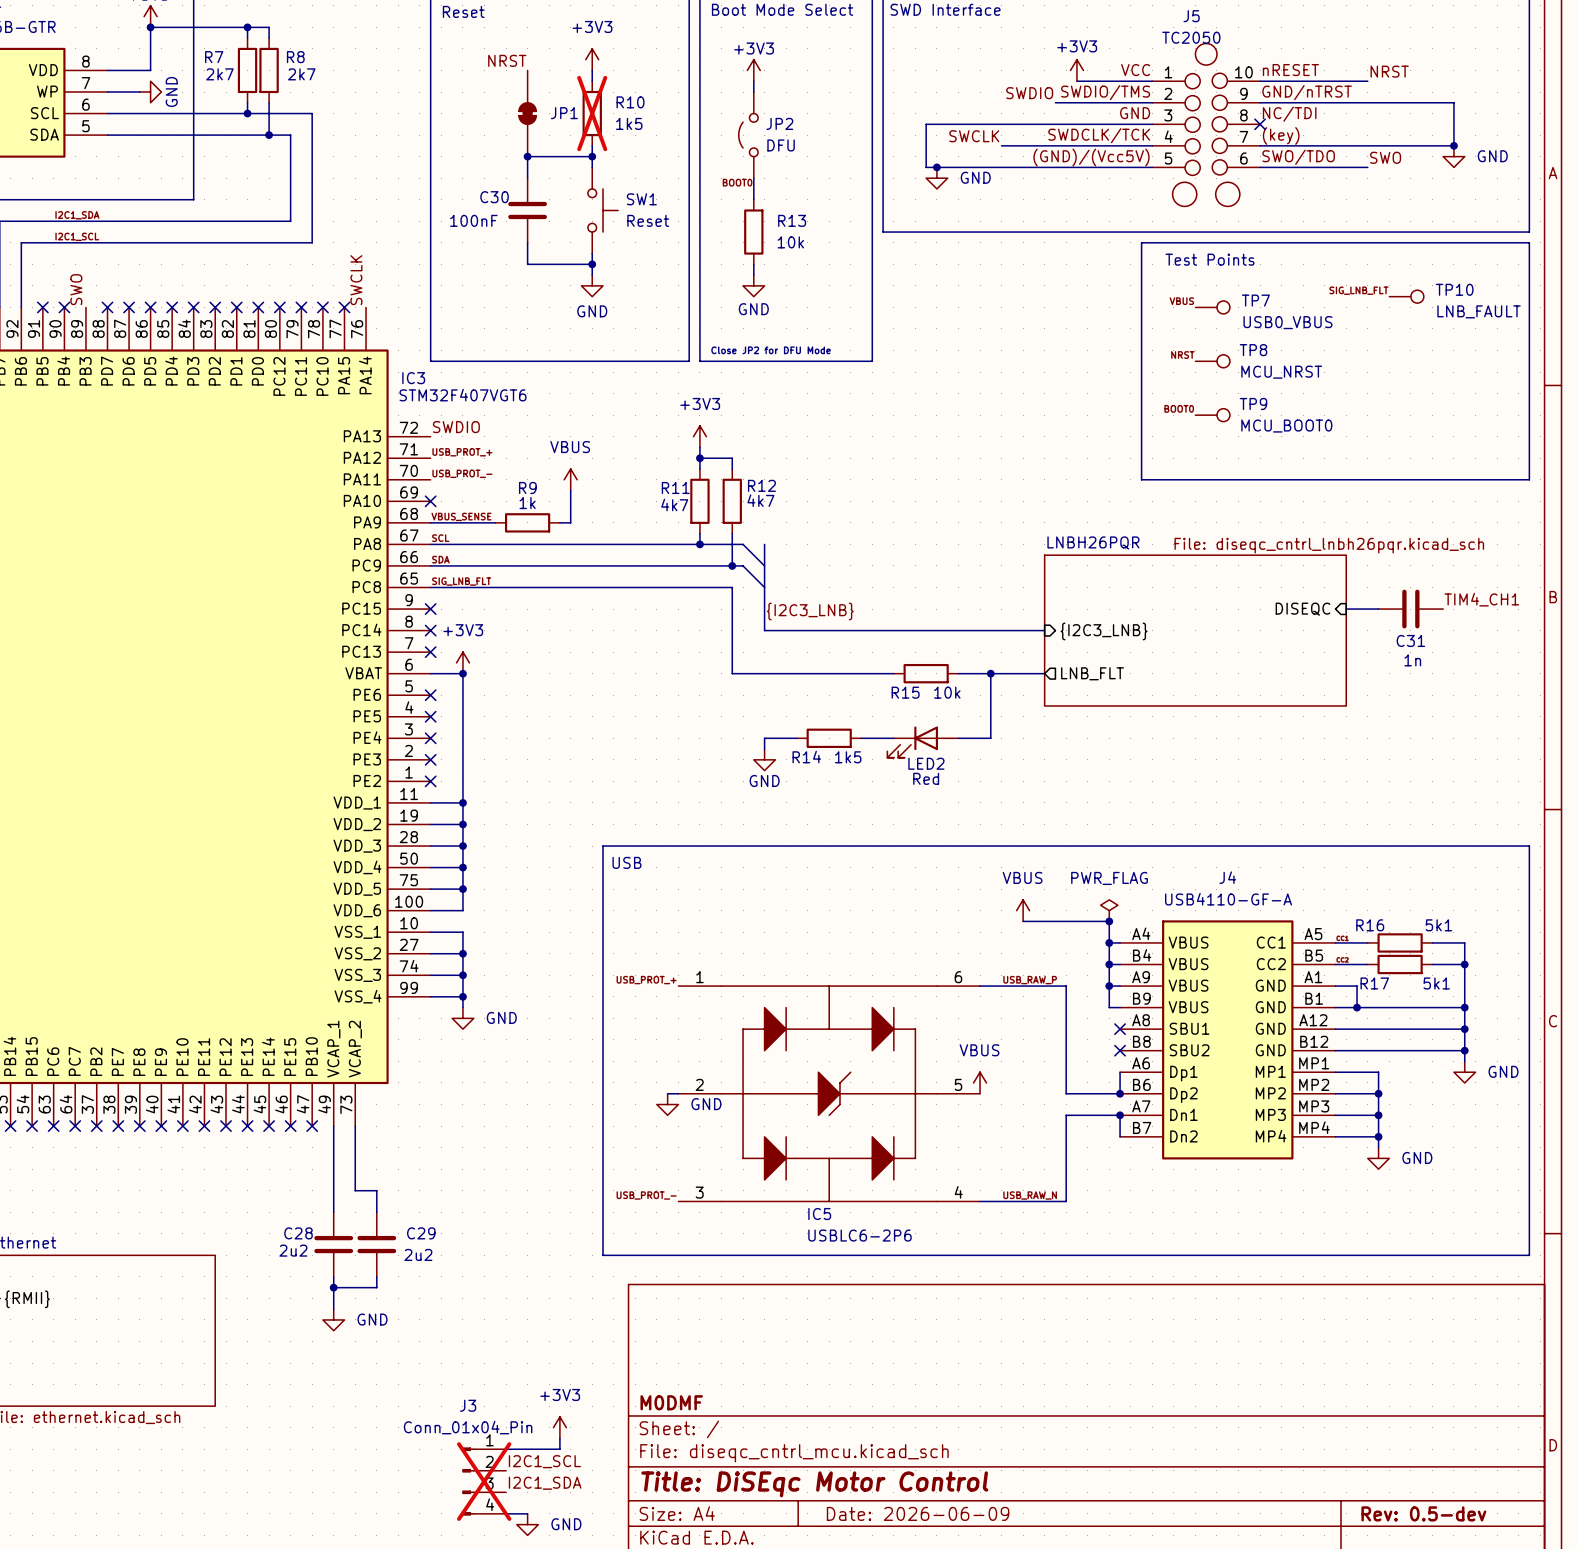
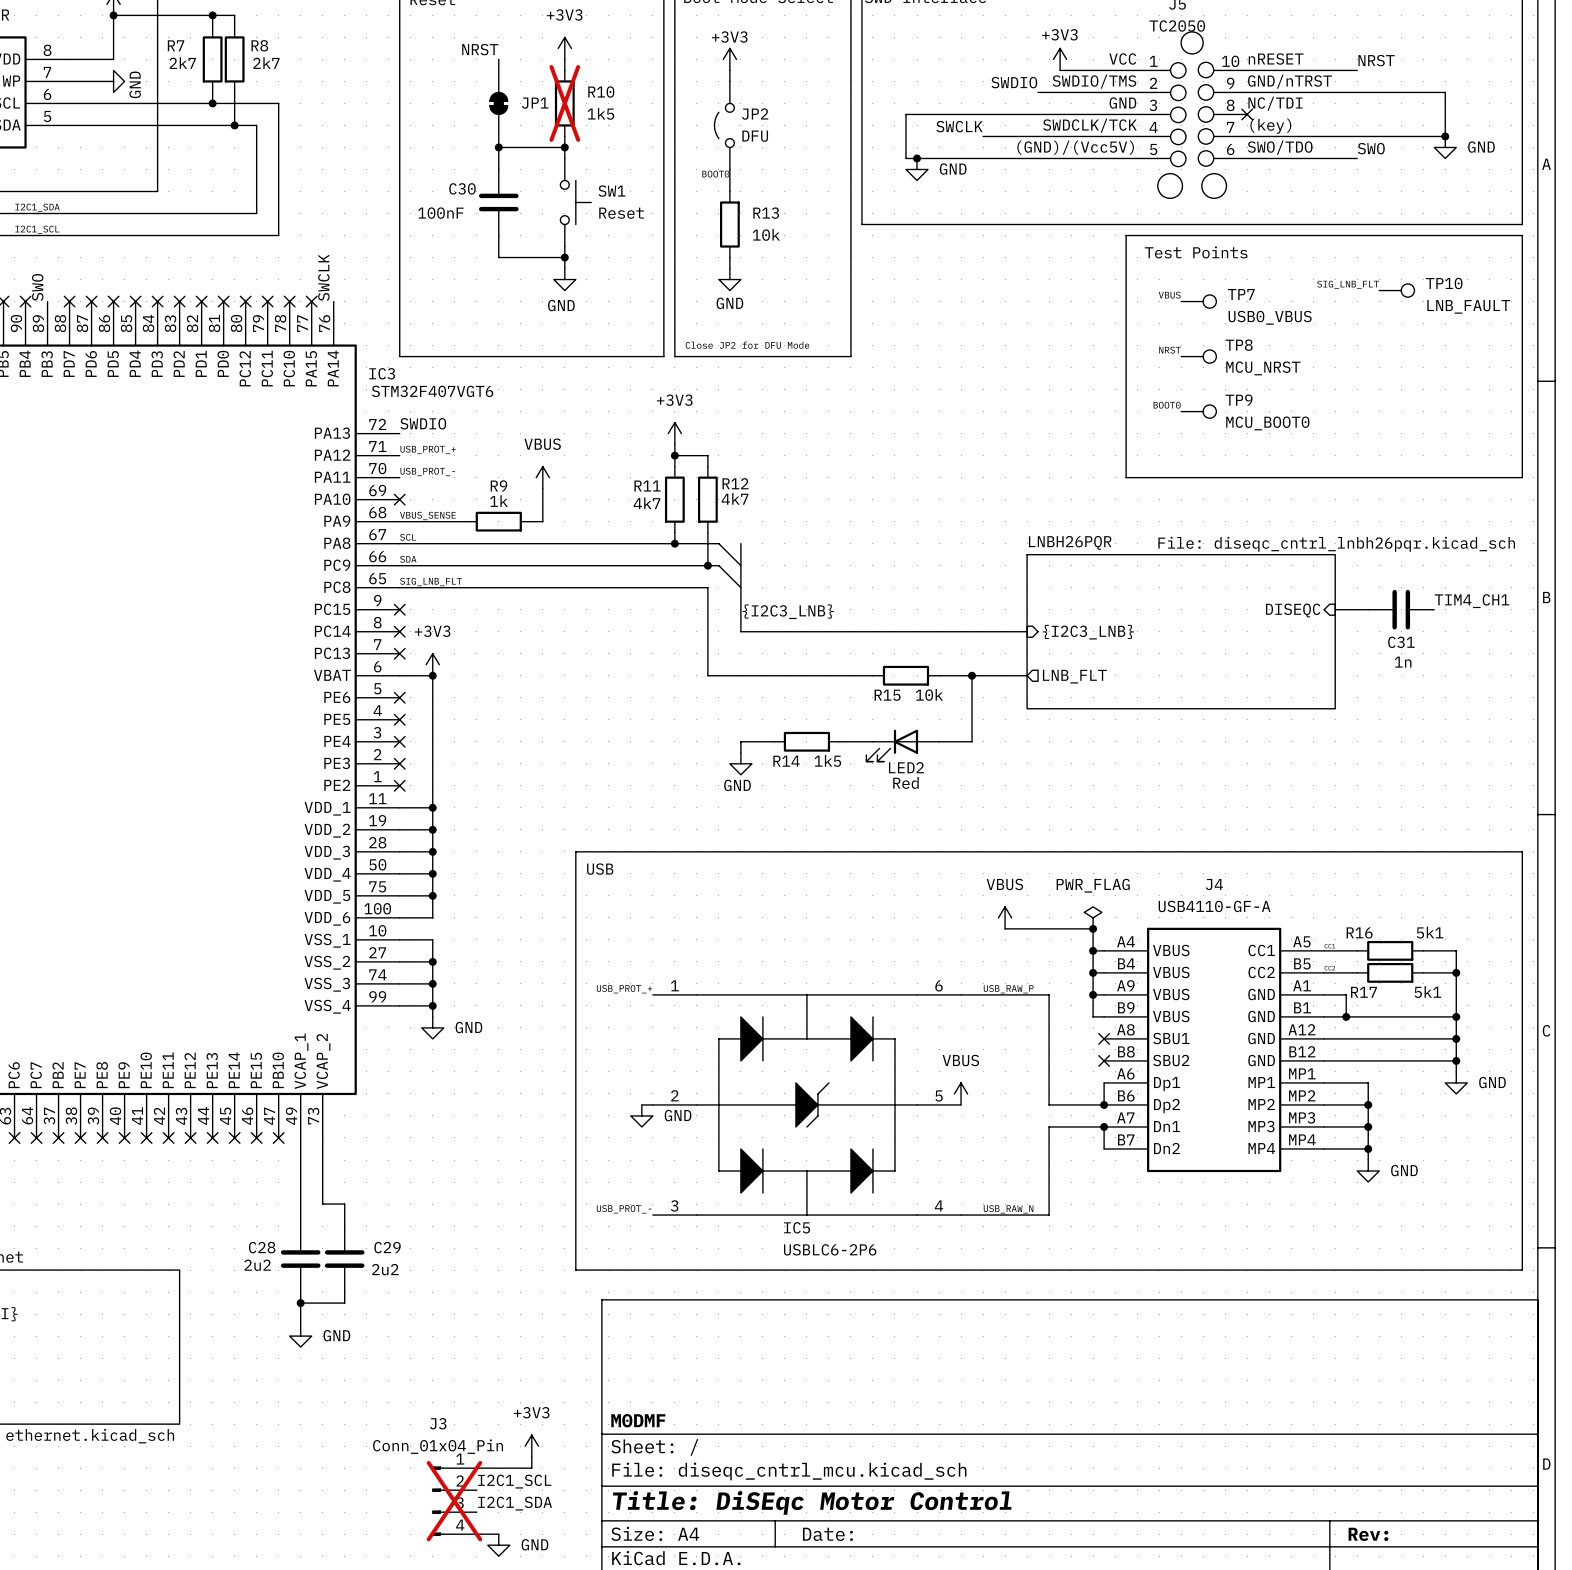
title block: Date: 2026-06-09 (918, 1513) -> Date: (827, 1534)
title block: Rev: 0.5-dev (1423, 1513) -> Rev: (1368, 1534)

